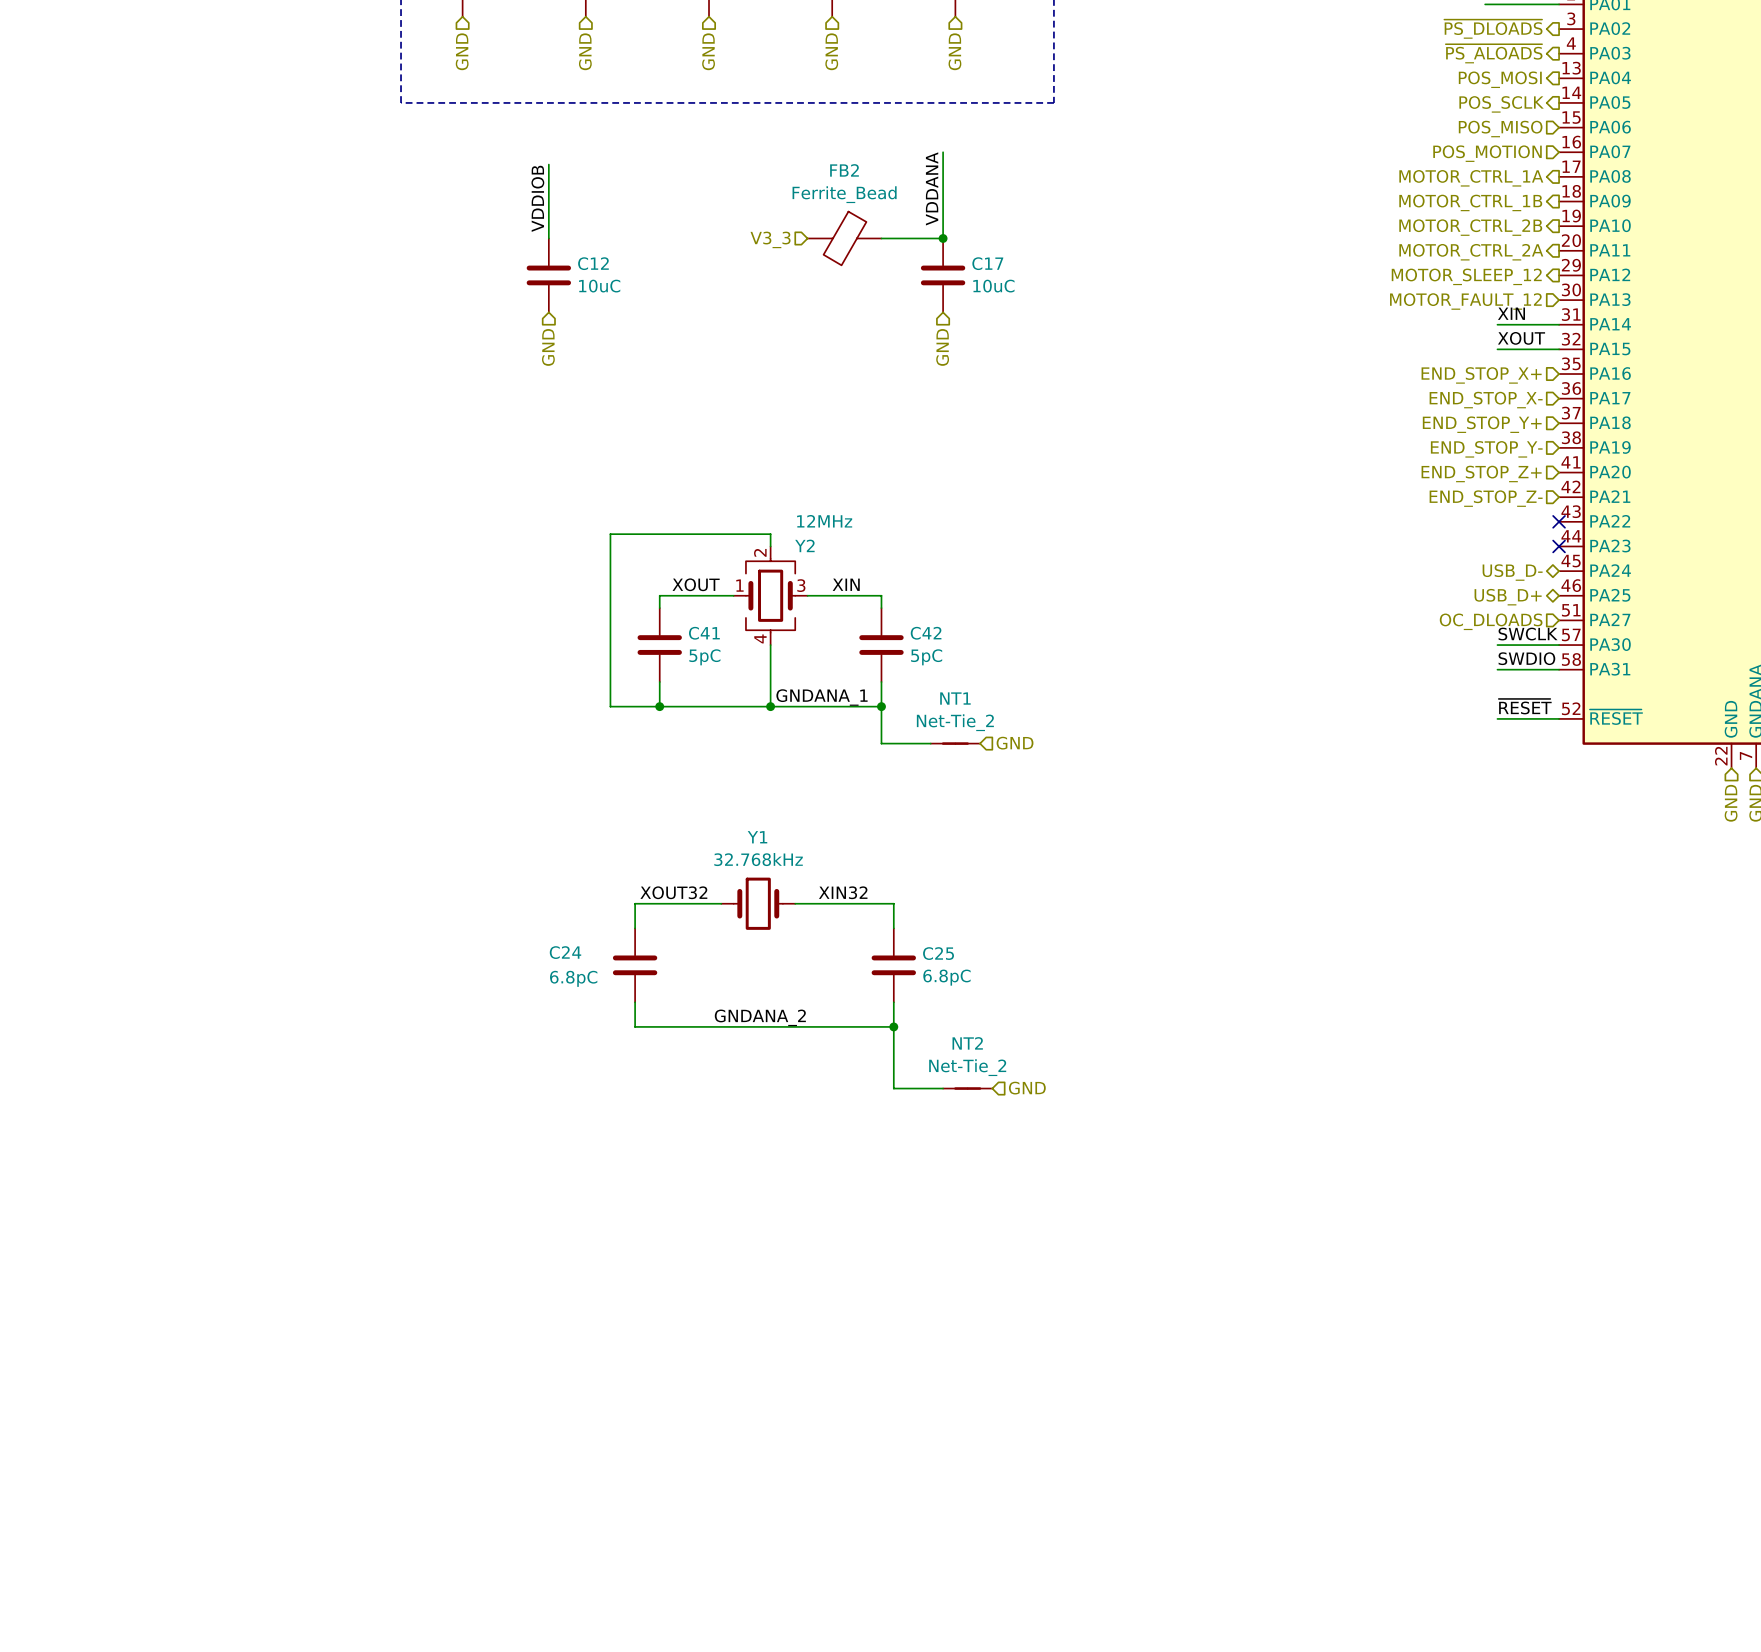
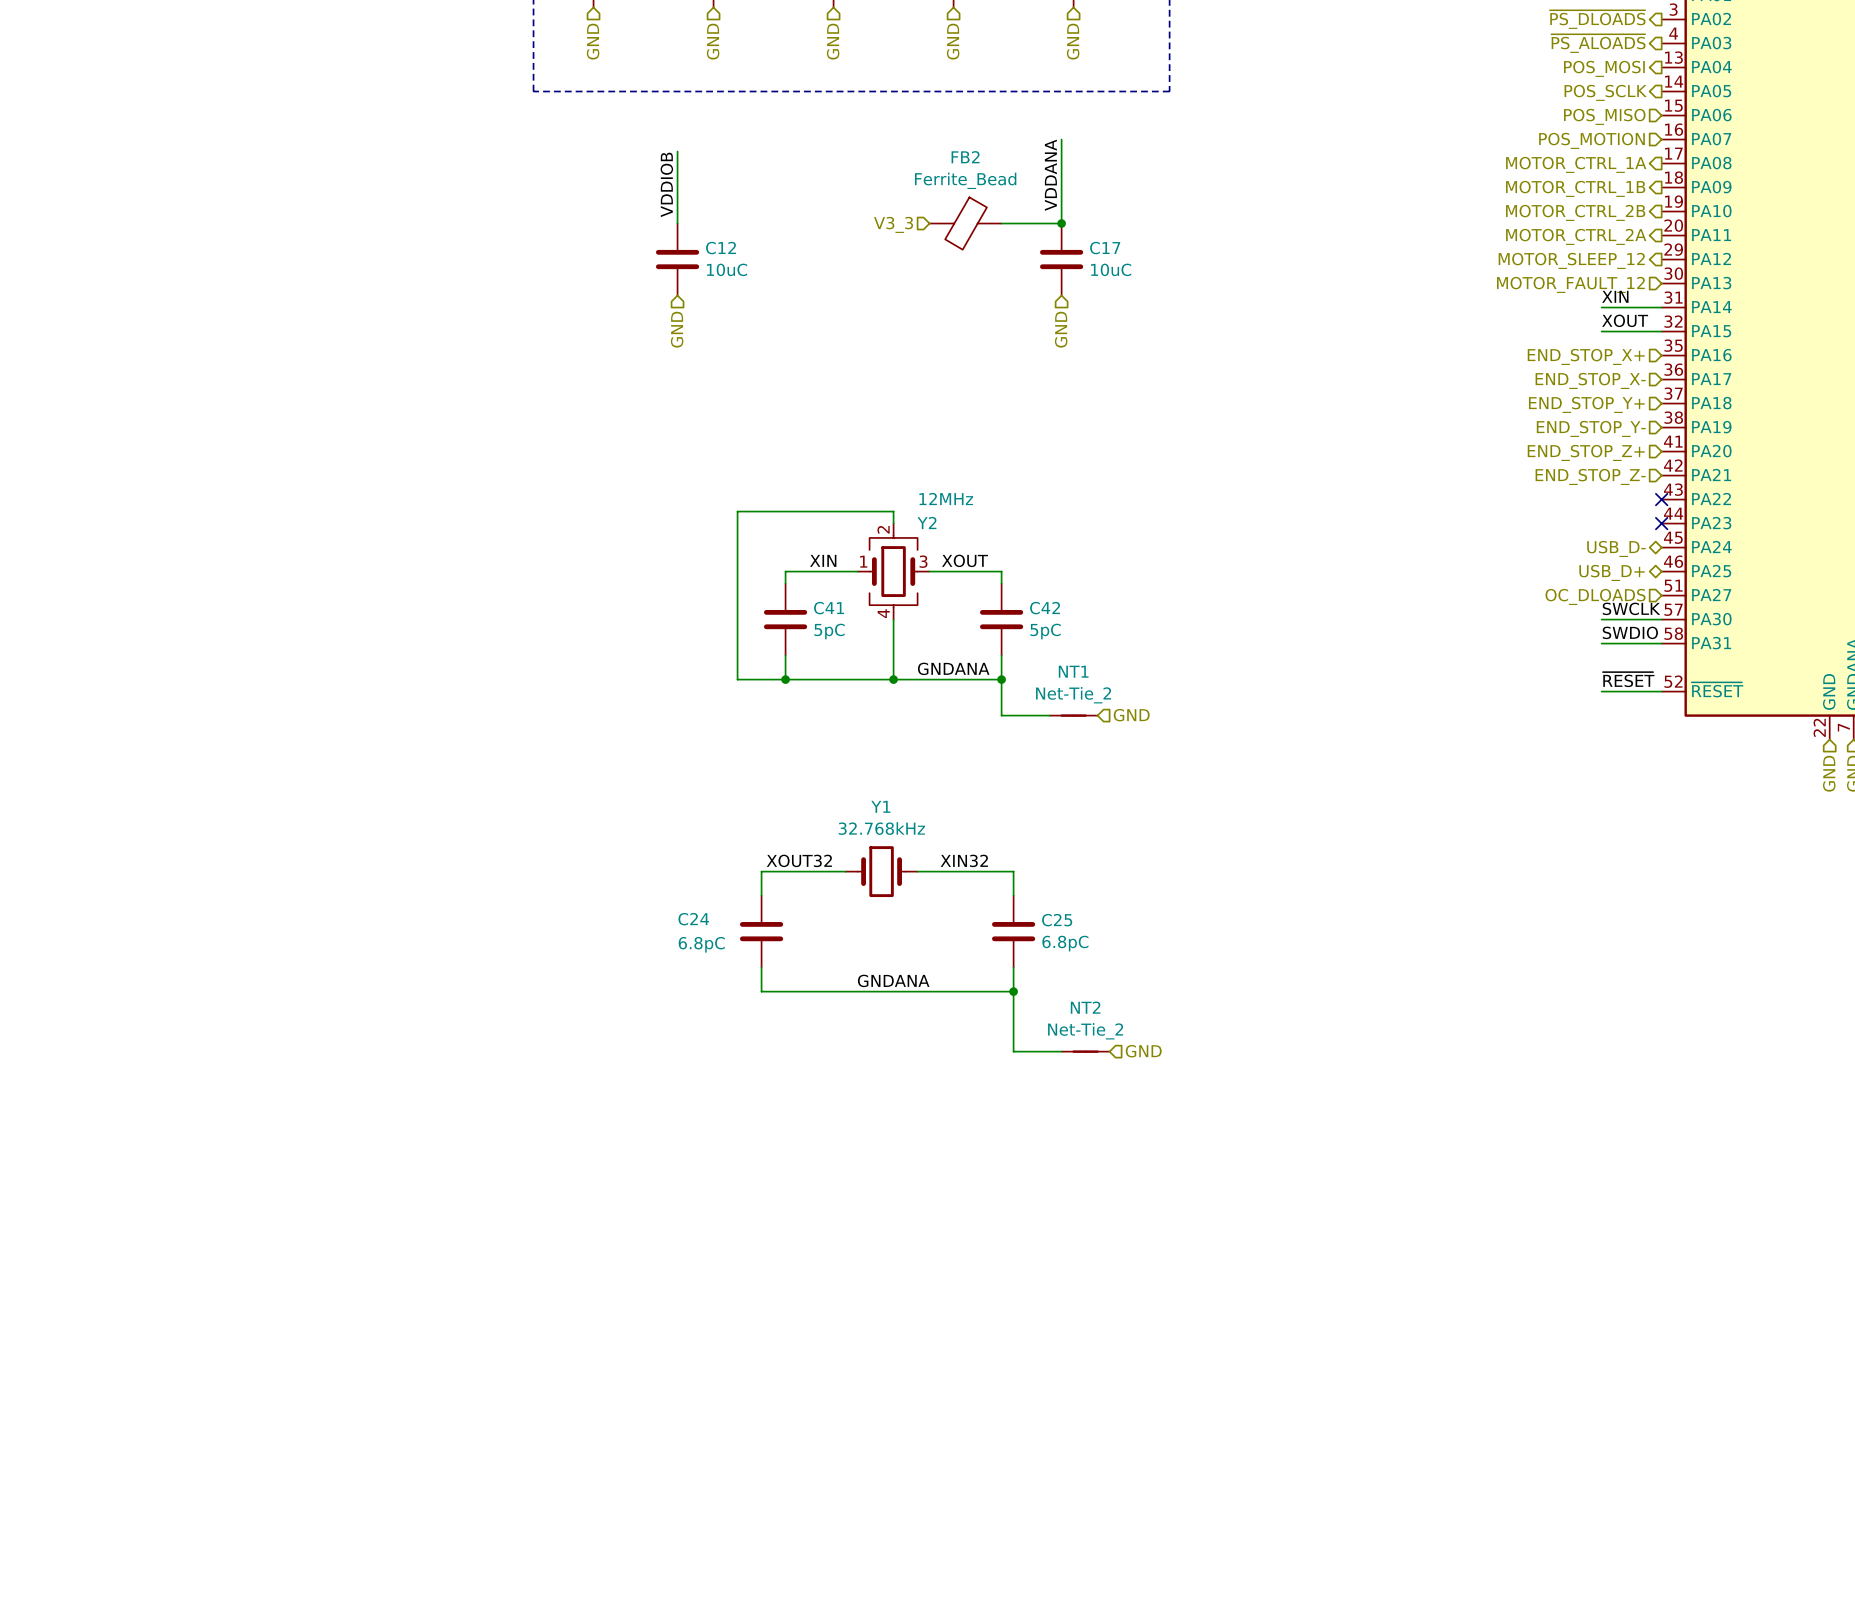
label position: XOUT (696, 584) -> XOUT (965, 560)
label position: XIN (846, 584) -> XIN (823, 560)
label: GNDANA_1 (822, 697) -> GNDANA (953, 668)
label: GNDANA_2 (760, 1017) -> GNDANA (893, 980)

